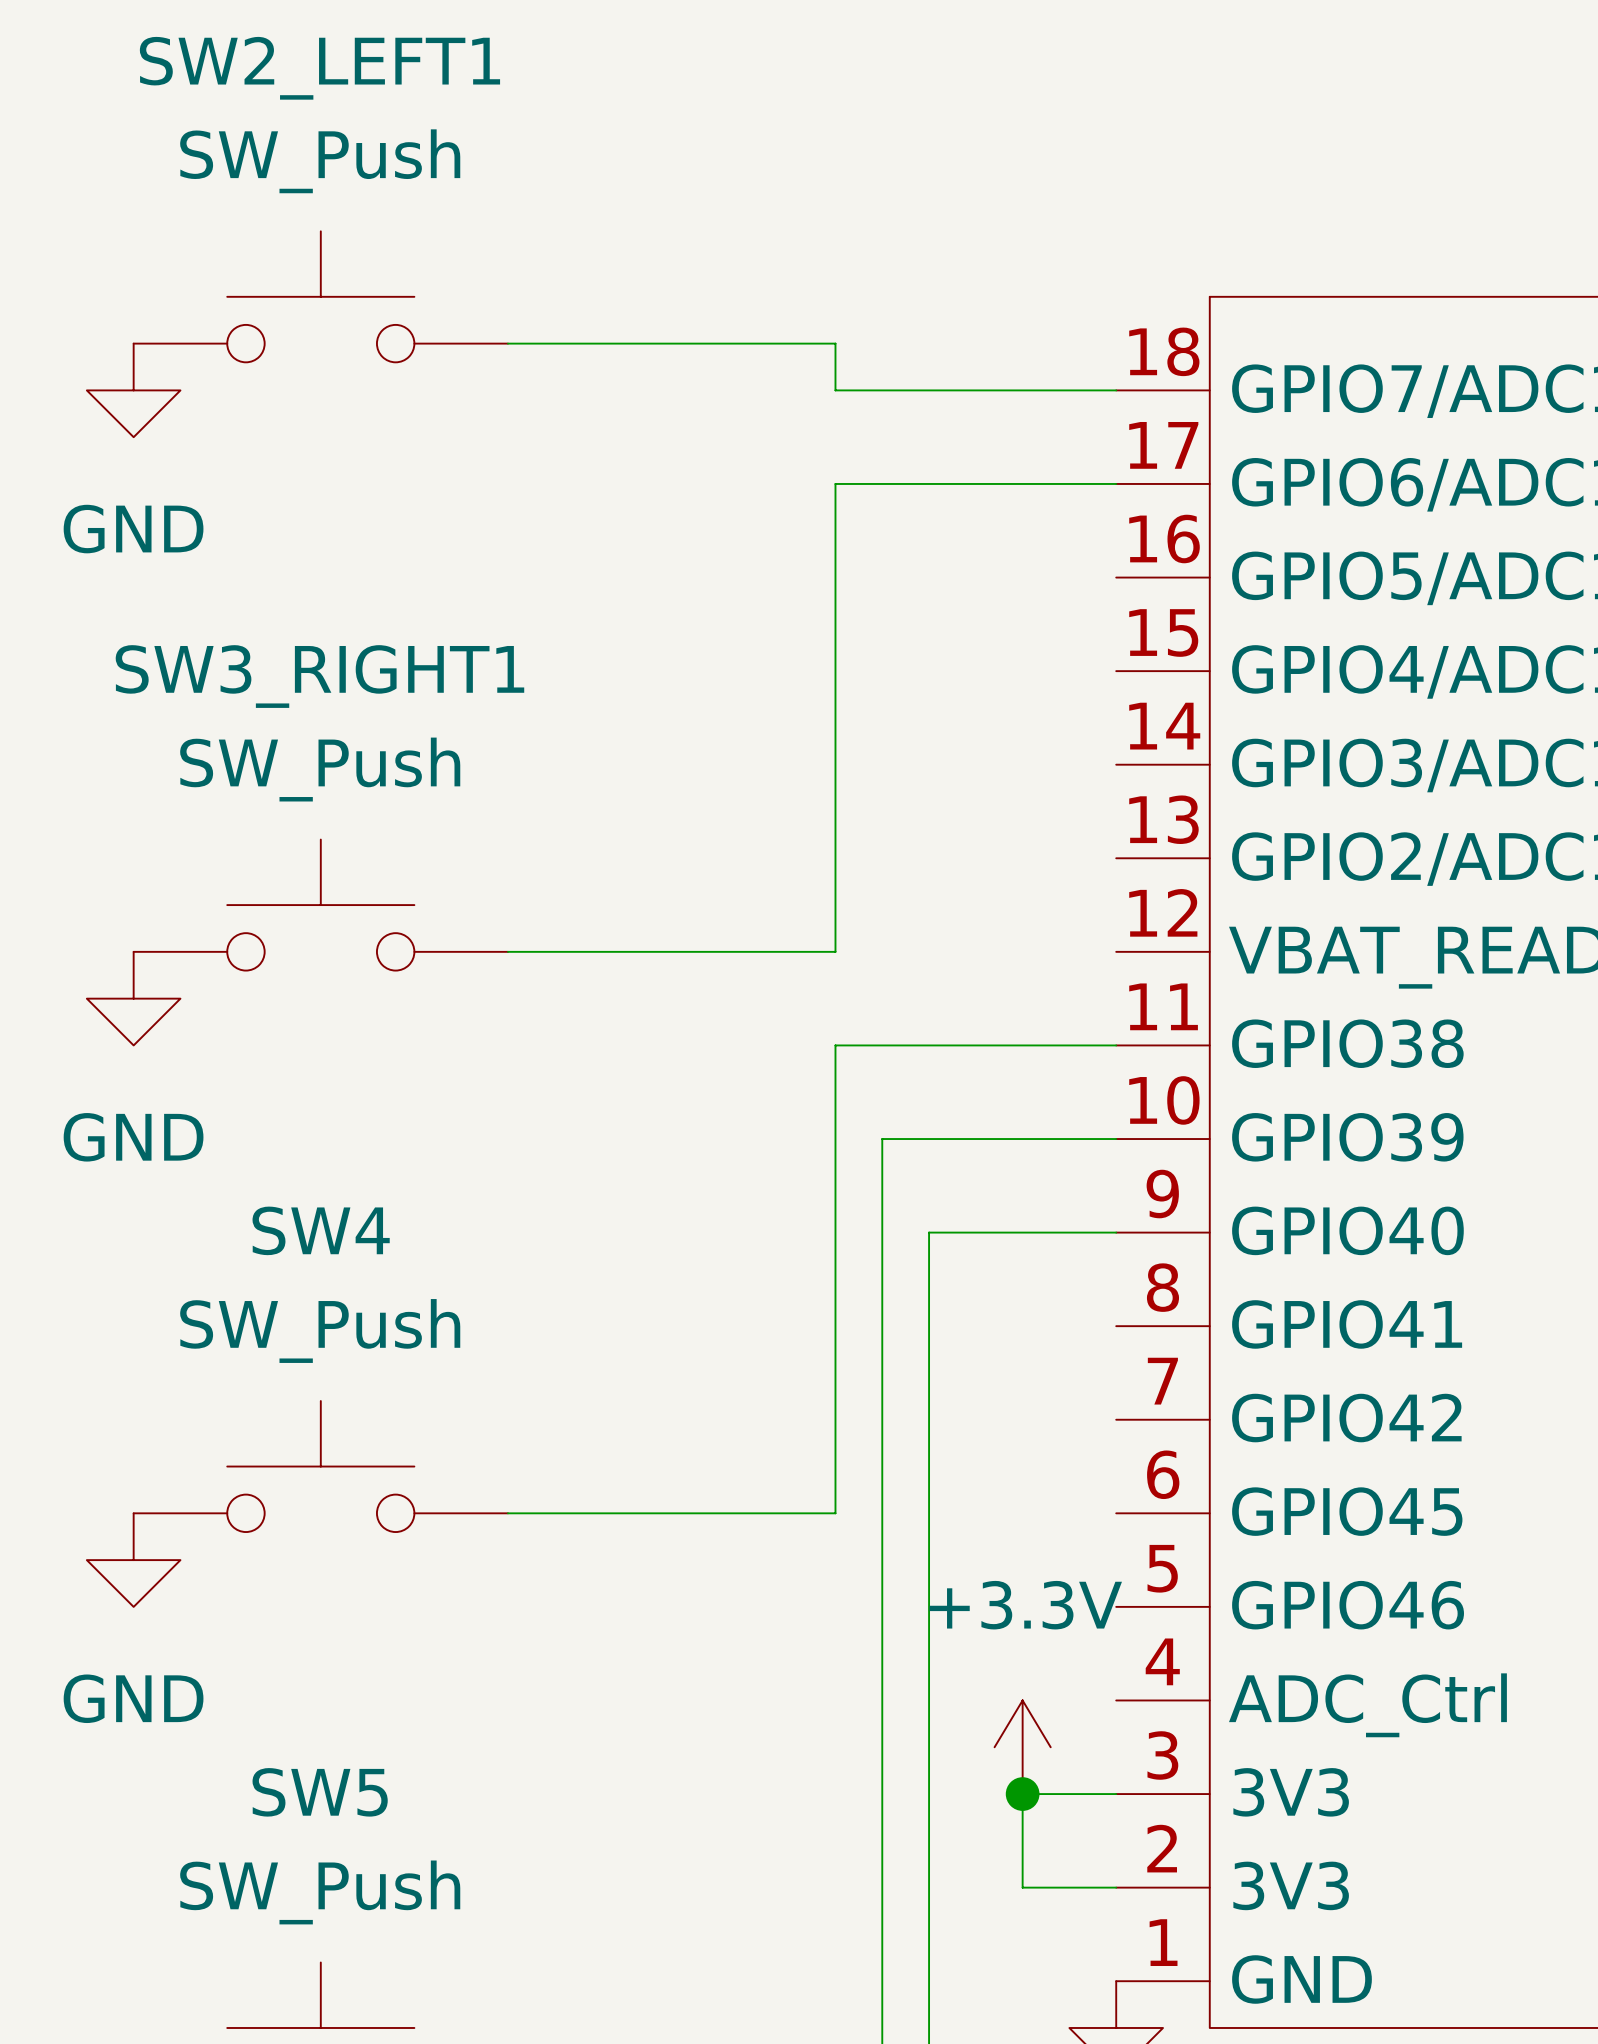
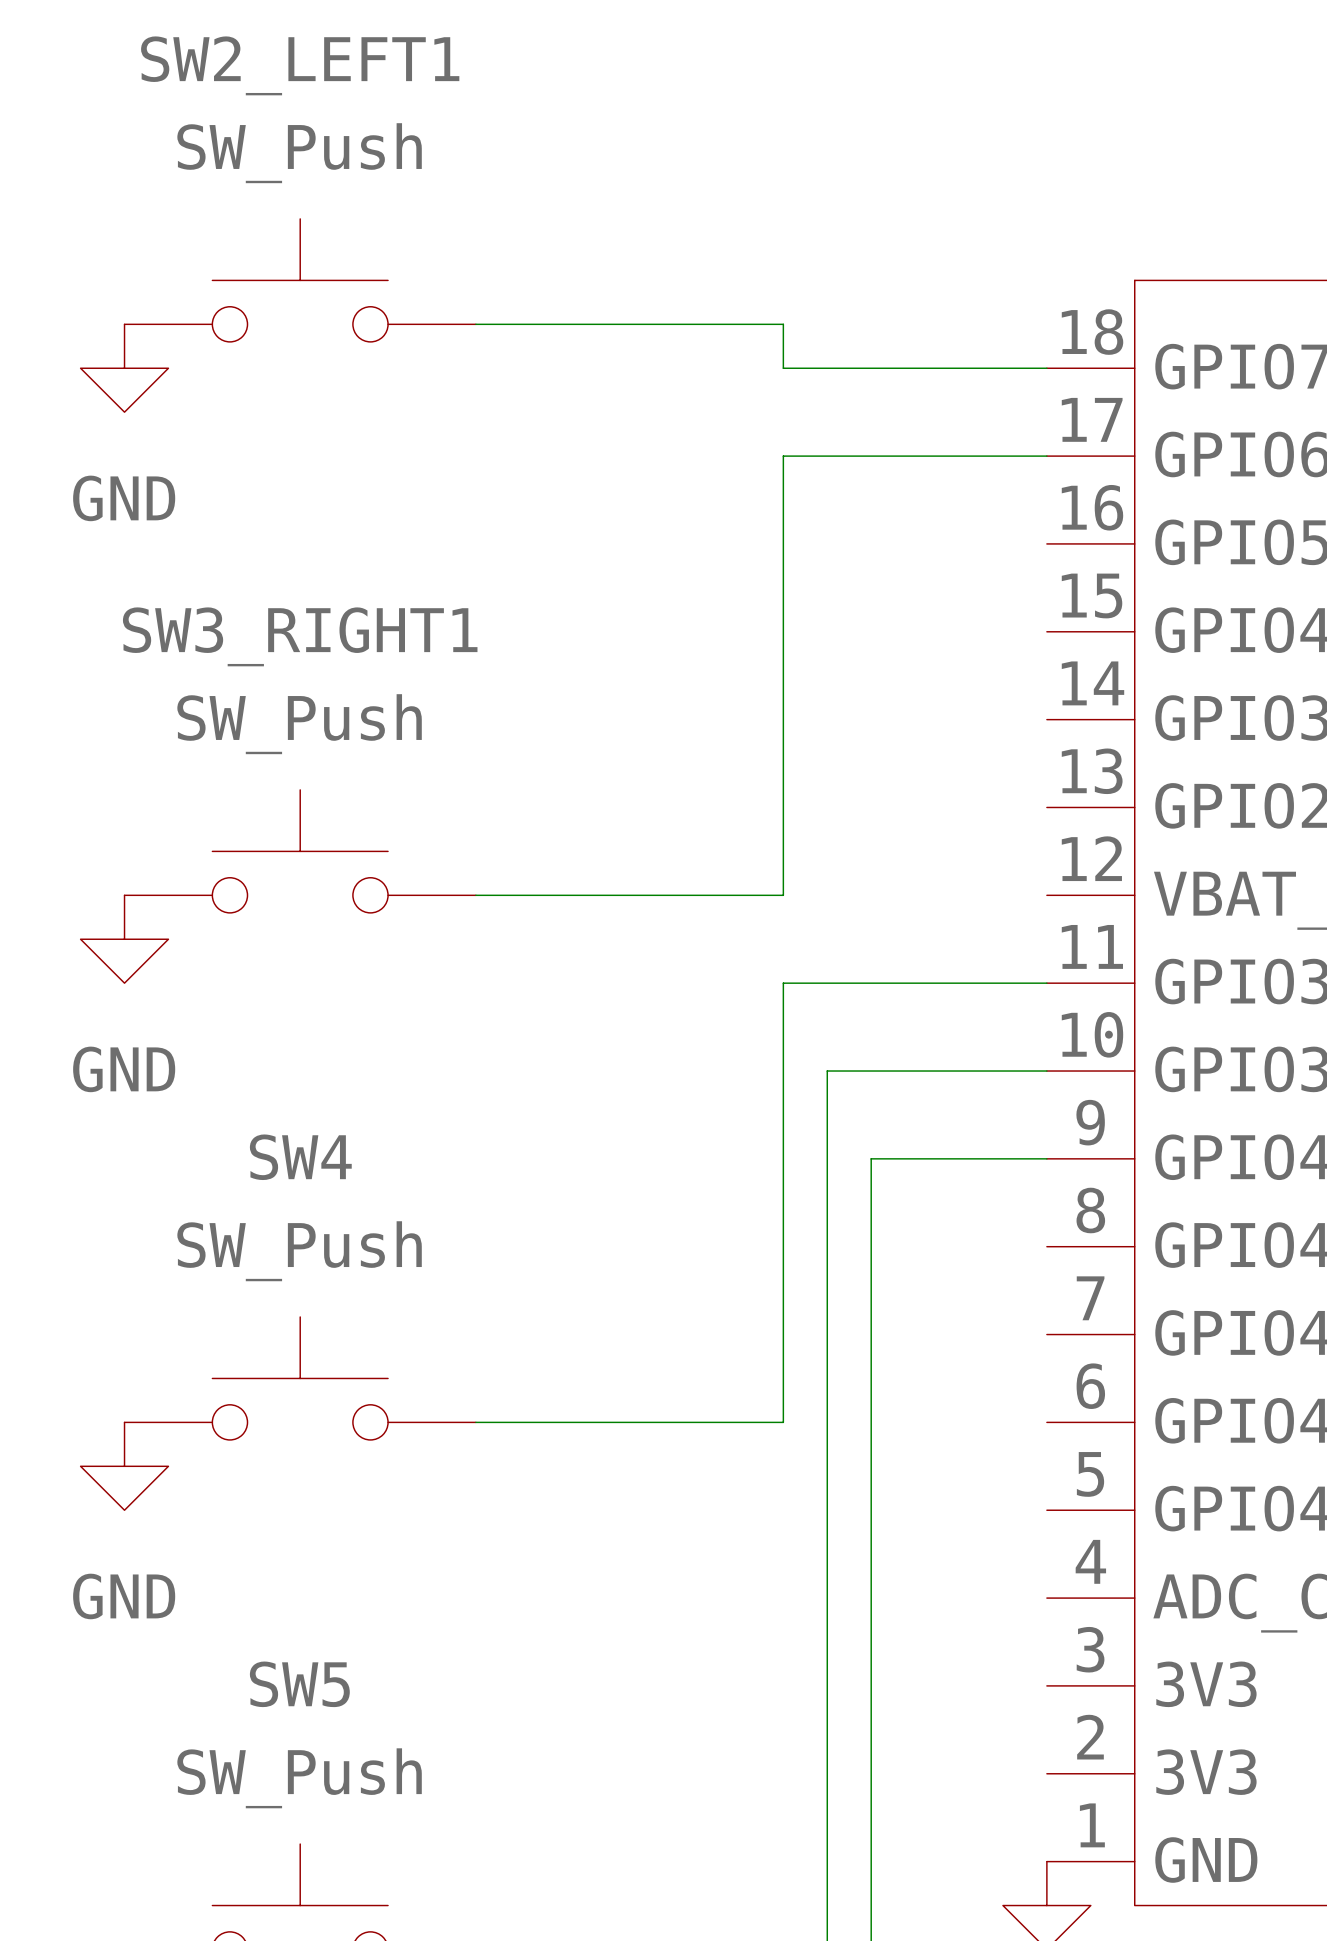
power symbol: +3.3V (1022, 1747) -> none
junction: (1022, 1794) -> none
wire: (1116, 1794) (1022, 1794) (1022, 1887) (1116, 1887) -> none

